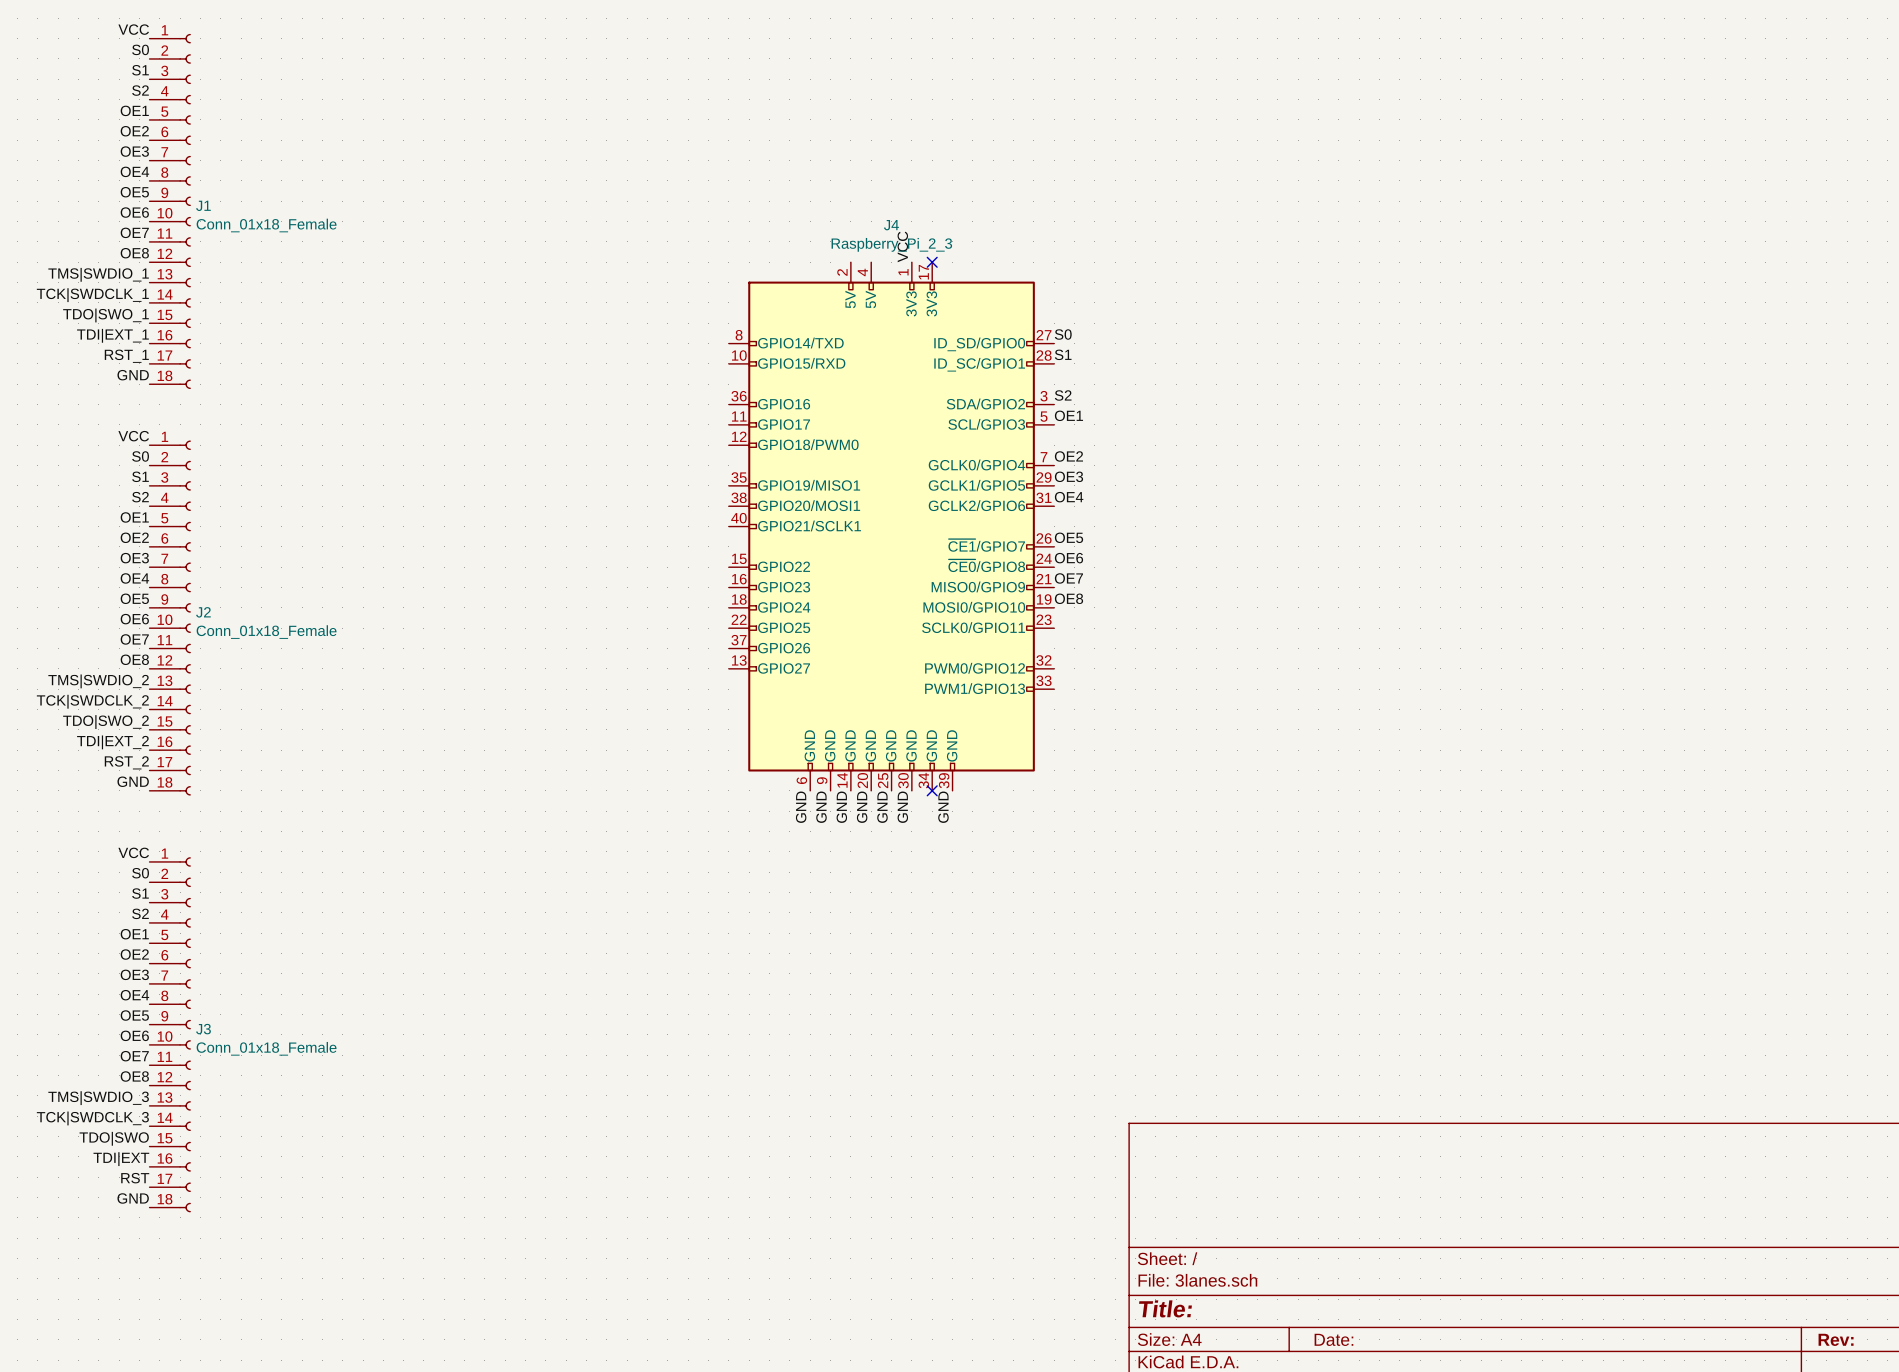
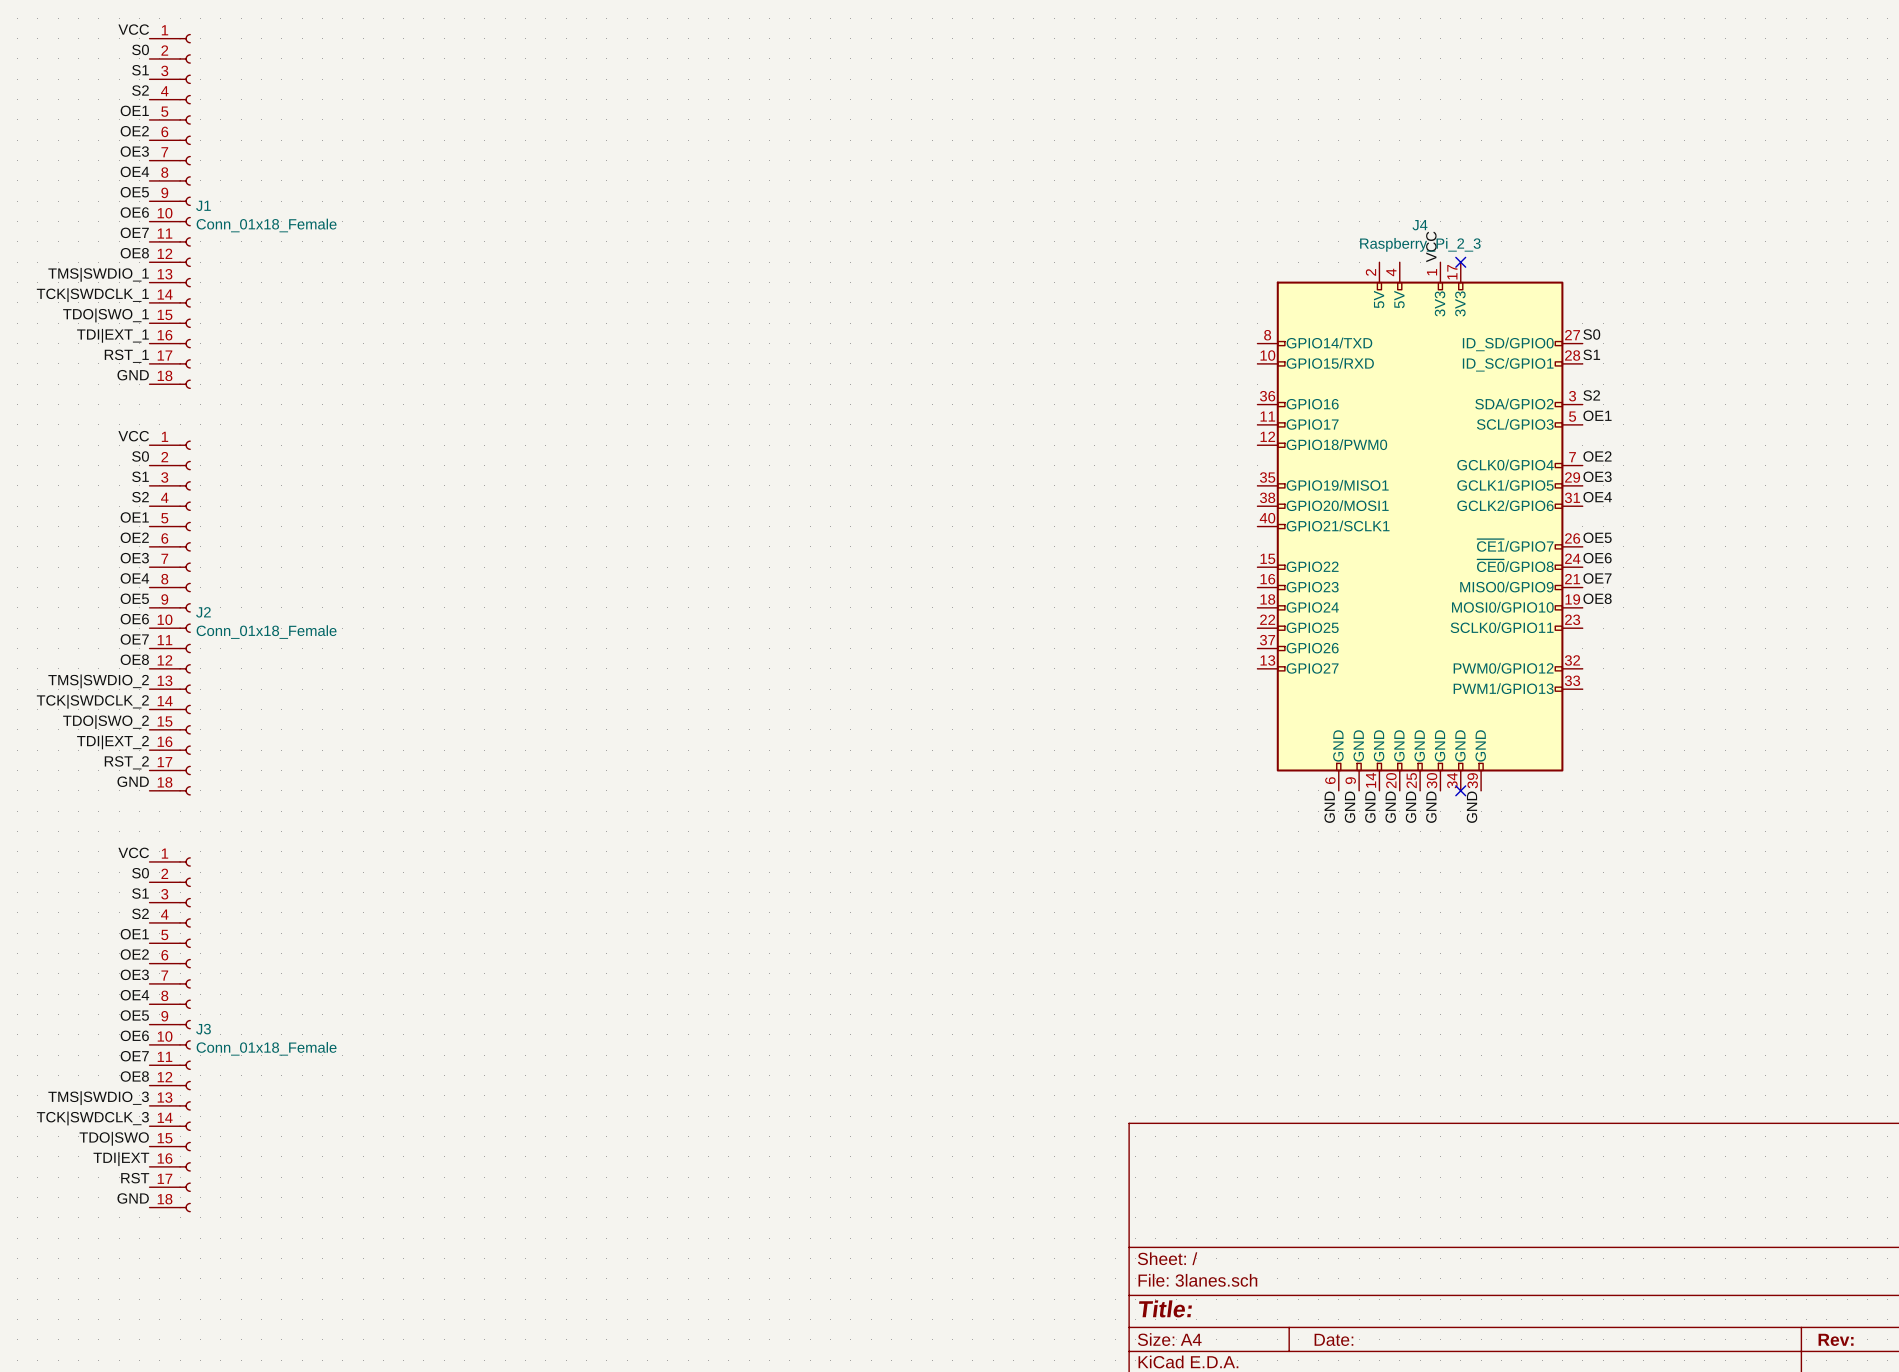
label: VCC (902, 246) -> none
label: none -> VCC (1431, 246)
no-connect mark: (932, 262) -> none
no-connect mark: none -> (1460, 262)
label: S0 (1063, 334) -> none
label: none -> S0 (1591, 334)
label: S1 (1063, 354) -> none
label: none -> S1 (1591, 354)
label: S2 (1063, 395) -> none
label: none -> S2 (1591, 395)
label: OE1 (1068, 415) -> none
label: none -> OE1 (1597, 415)
label: OE2 (1068, 456) -> none
label: none -> OE2 (1597, 456)
label: OE3 (1068, 476) -> none
label: none -> OE3 (1597, 476)
label: OE4 (1069, 497) -> none
label: none -> OE4 (1597, 497)
J4 position: (891, 526) -> (1420, 526)
label: OE5 (1069, 537) -> none
label: none -> OE5 (1597, 537)
label: OE6 (1068, 558) -> none
label: none -> OE6 (1597, 558)
label: OE7 (1068, 578) -> none
label: none -> OE7 (1597, 578)
label: OE8 (1068, 598) -> none
label: none -> OE8 (1597, 598)
no-connect mark: (932, 790) -> none
no-connect mark: none -> (1460, 790)
label: GND (801, 807) -> none
label: GND (821, 807) -> none
label: GND (841, 807) -> none
label: GND (862, 807) -> none
label: GND (882, 807) -> none
label: GND (902, 807) -> none
label: GND (943, 807) -> none
label: none -> GND (1329, 807)
label: none -> GND (1350, 807)
label: none -> GND (1370, 807)
label: none -> GND (1390, 807)
label: none -> GND (1411, 807)
label: none -> GND (1431, 807)
label: none -> GND (1472, 807)

